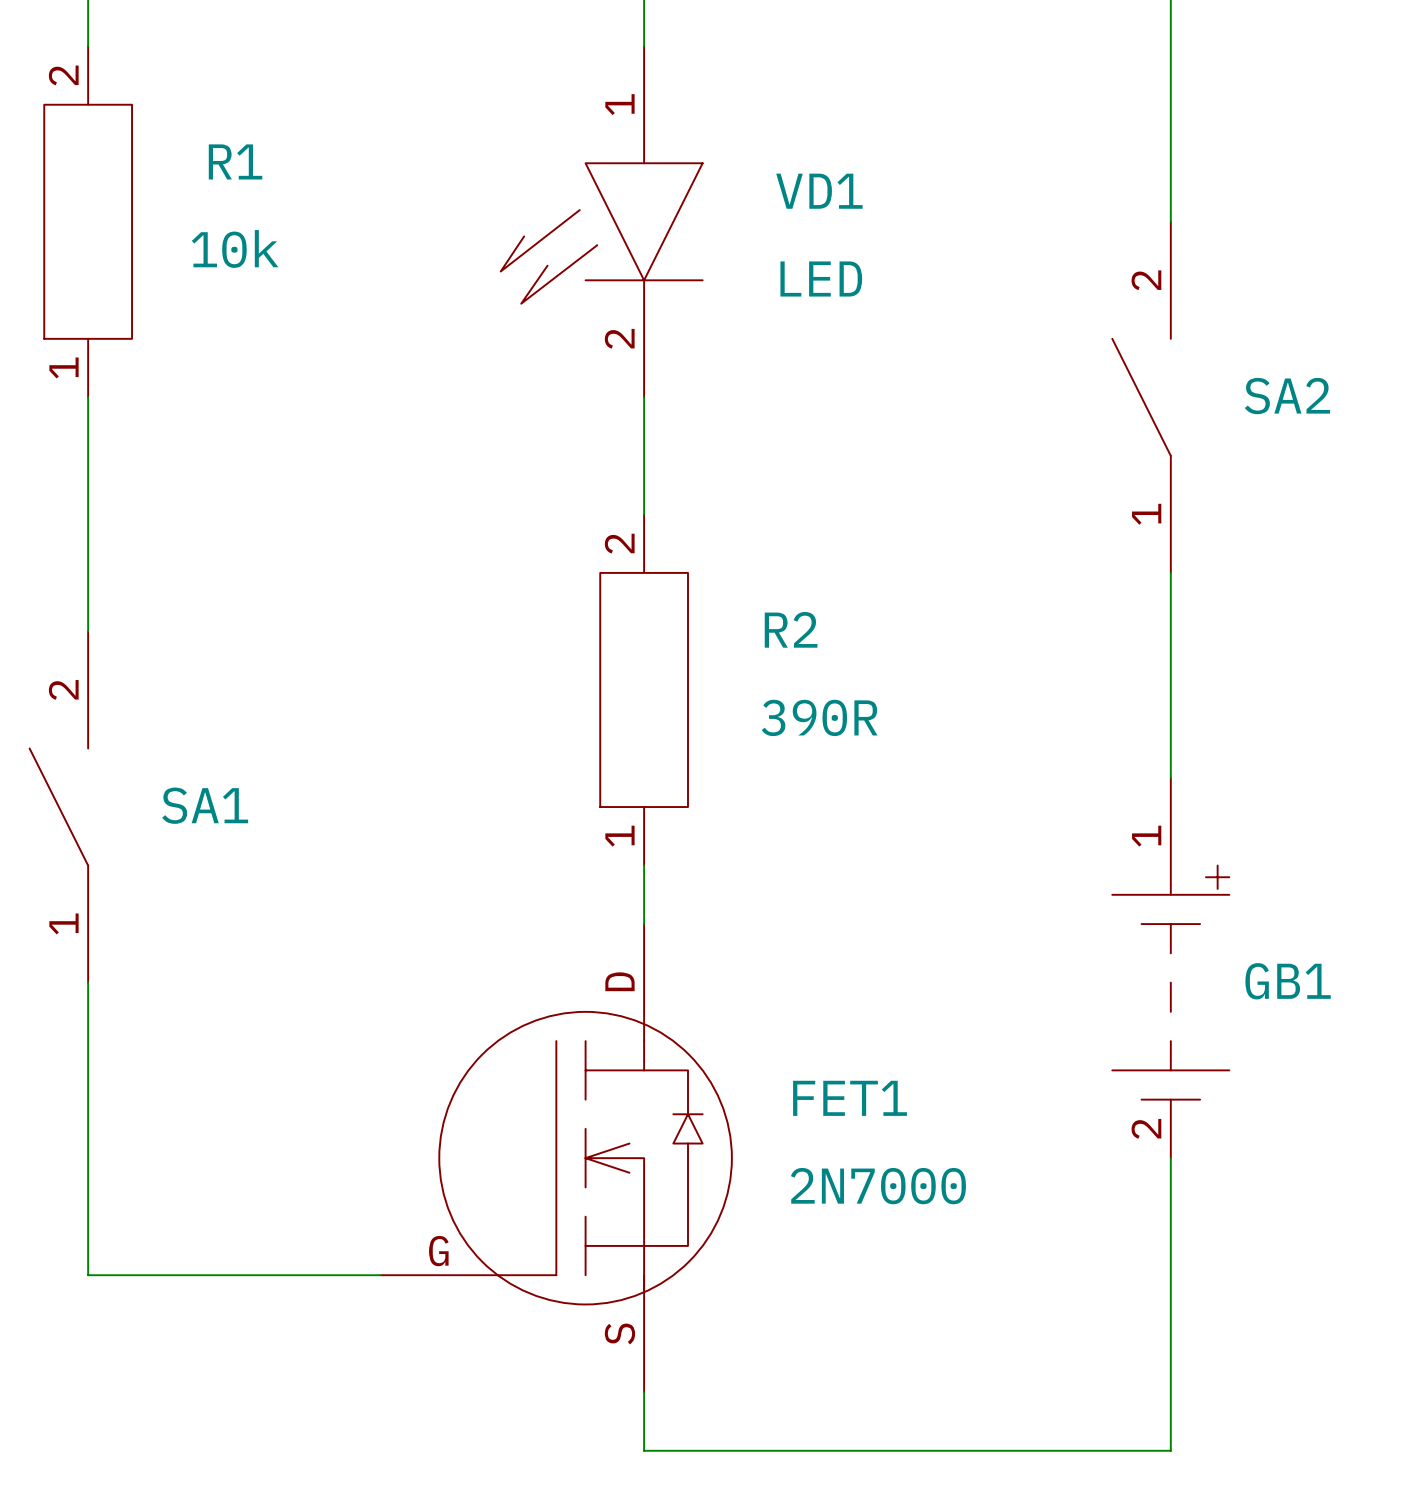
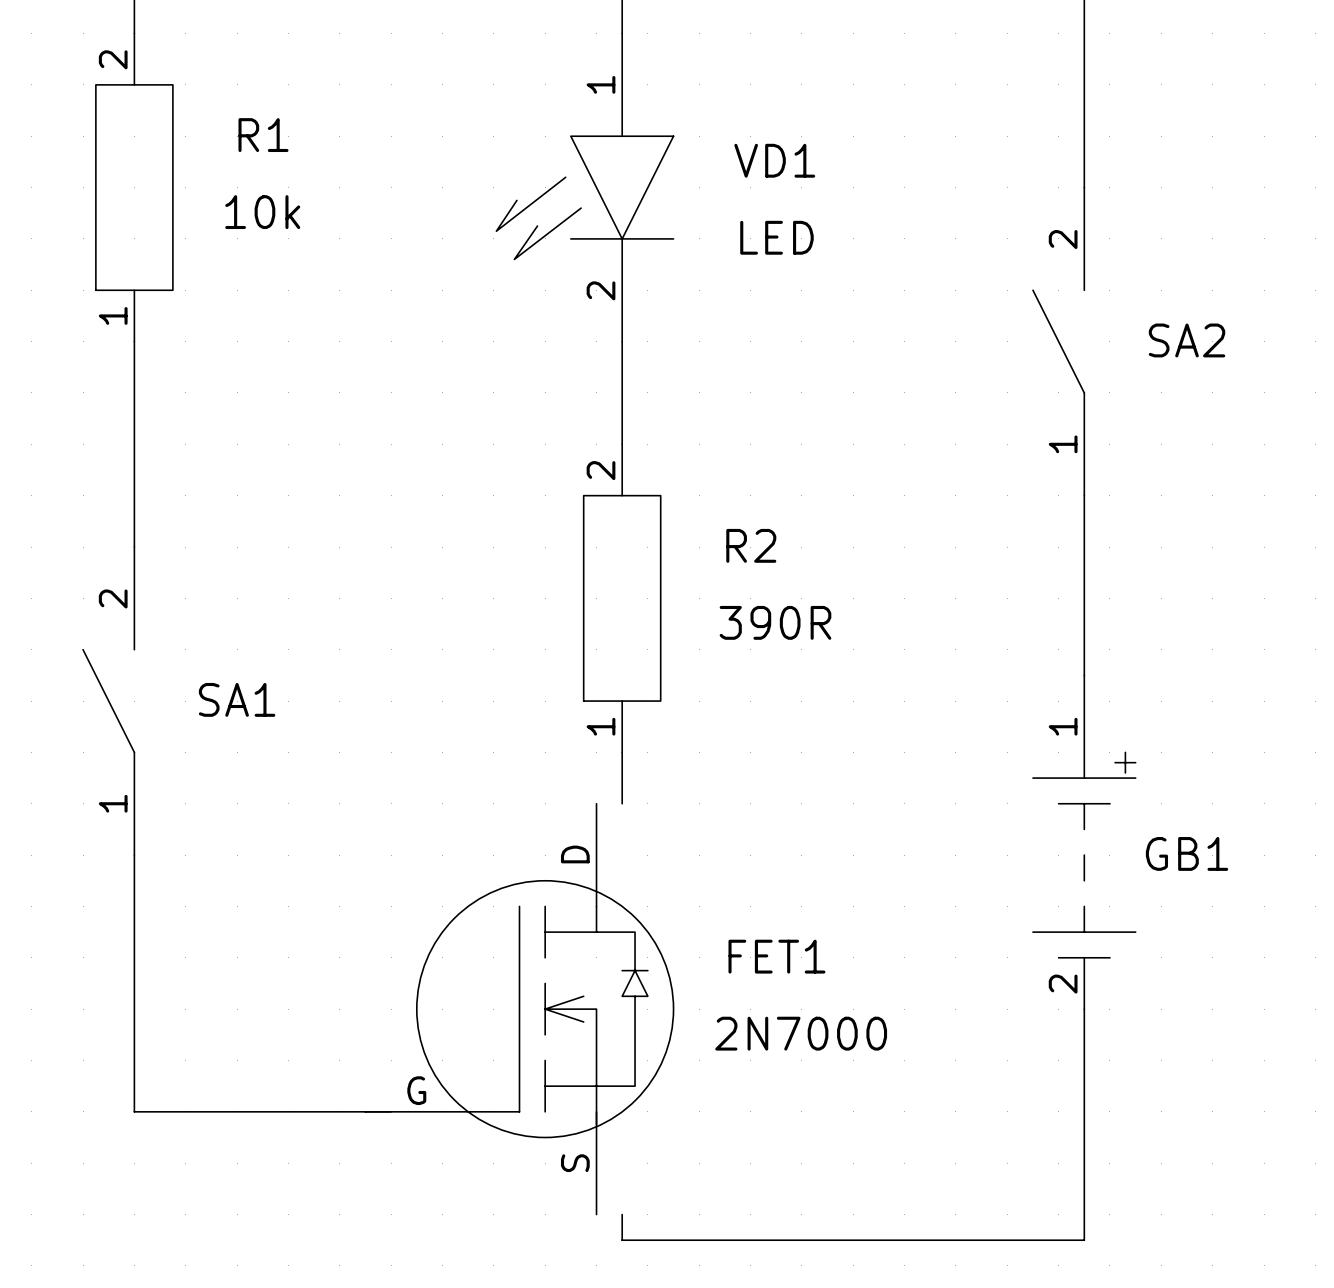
FET1 position: (556, 1158) -> (519, 1009)
wire: (644, 1421) (644, 1450) (1170, 1450) (1170, 1421) -> (622, 1240) (1084, 1240)

